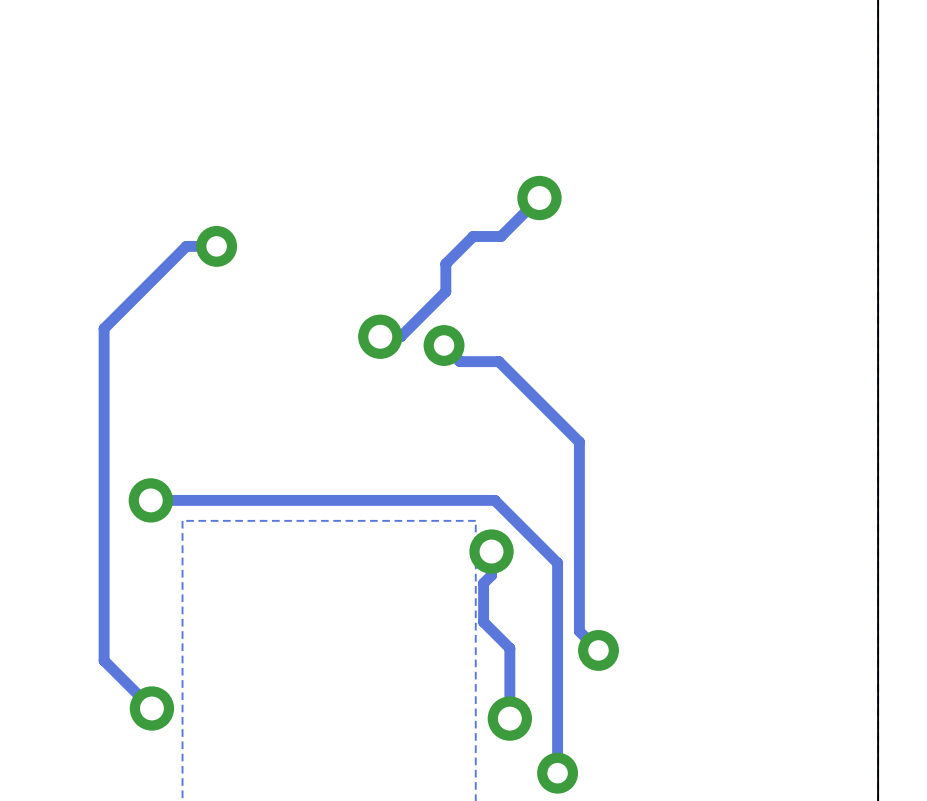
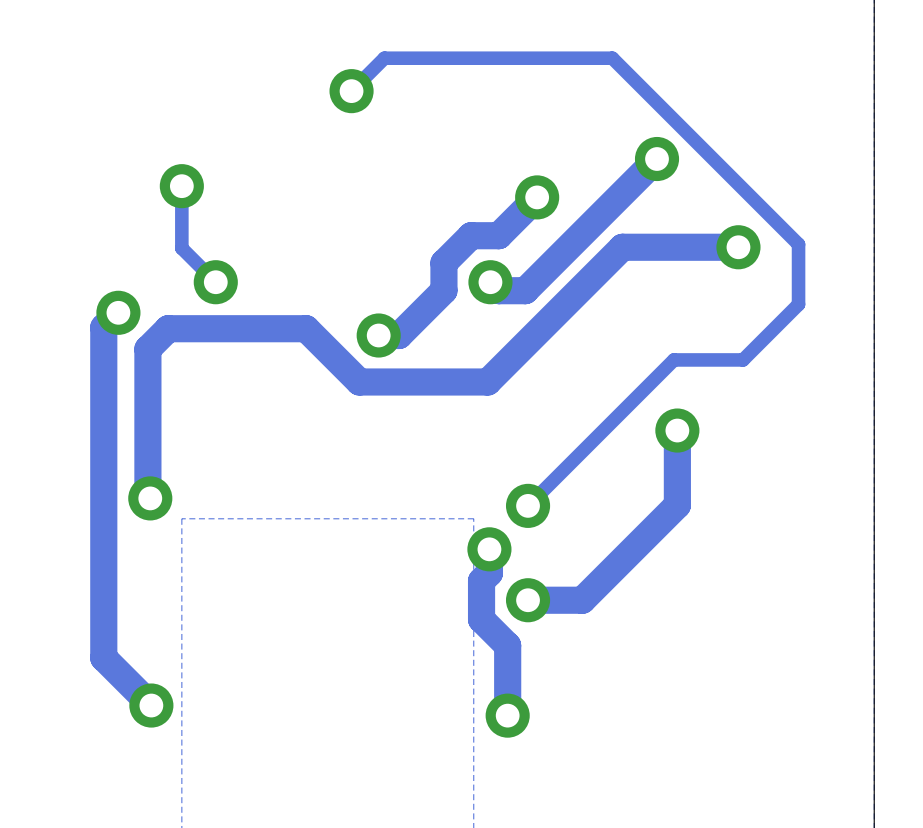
track: none -> (351, 91) (384, 58) (612, 58) (798, 244) (798, 304) (743, 359) (673, 359) (528, 505)
via: none -> (351, 91)
track: none -> (657, 159) (525, 290) (498, 290) (490, 282)
via: none -> (657, 159)
track: none -> (181, 186) (181, 248) (215, 282)
via: none -> (181, 186)
track width: thin (539, 198) (500, 236) (473, 236) (445, 263) (445, 291) (400, 336) (380, 336) -> thick (537, 197) (498, 235) (471, 235) (443, 262) (443, 290) (399, 335) (378, 335)
track: (216, 246) (186, 246) (118, 313) -> none
via position: (216, 246) -> (215, 282)
via: none -> (738, 247)
via: none -> (490, 282)
track width: thin (118, 313) (104, 328) (104, 660) (151, 708) -> thick (118, 312) (103, 327) (103, 657) (151, 705)
via: none -> (118, 312)
track: (444, 345) (460, 361) (498, 361) (579, 442) (579, 631) (598, 650) -> none
via: (444, 345) -> none
track: none -> (677, 430) (677, 505) (582, 600) (528, 600)
via: none -> (677, 430)
track: (150, 500) (494, 500) (557, 563) (557, 773) -> (150, 498) (147, 498) (147, 349) (168, 328) (306, 328) (359, 382) (487, 382) (622, 247) (738, 247)
via: none -> (528, 505)
track width: thin (491, 551) (491, 575) (483, 583) (483, 622) (509, 648) (509, 718) -> thick (489, 549) (489, 573) (481, 580) (481, 619) (507, 645) (507, 715)
via: none -> (528, 600)
via: (598, 650) -> none
via: (557, 773) -> none

